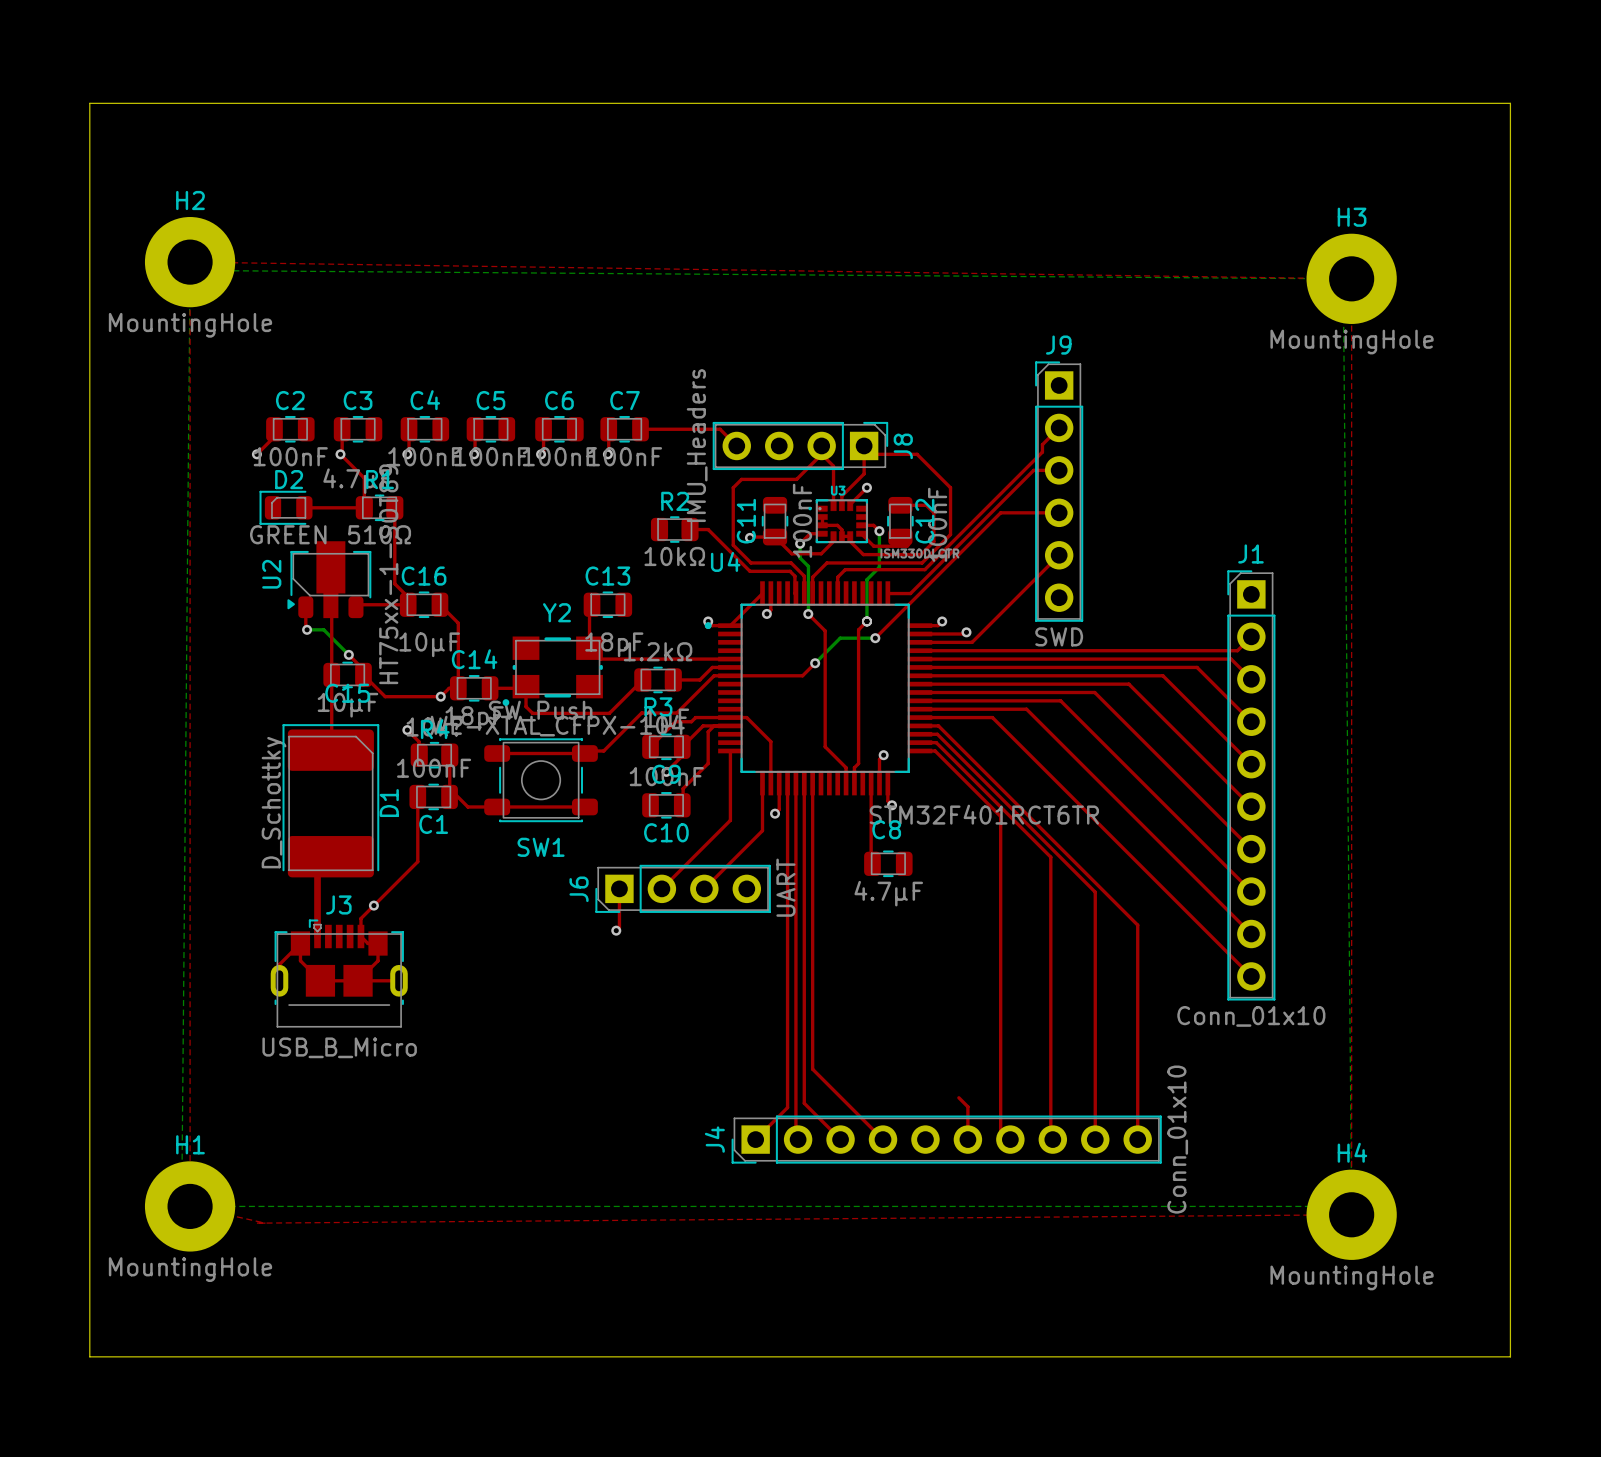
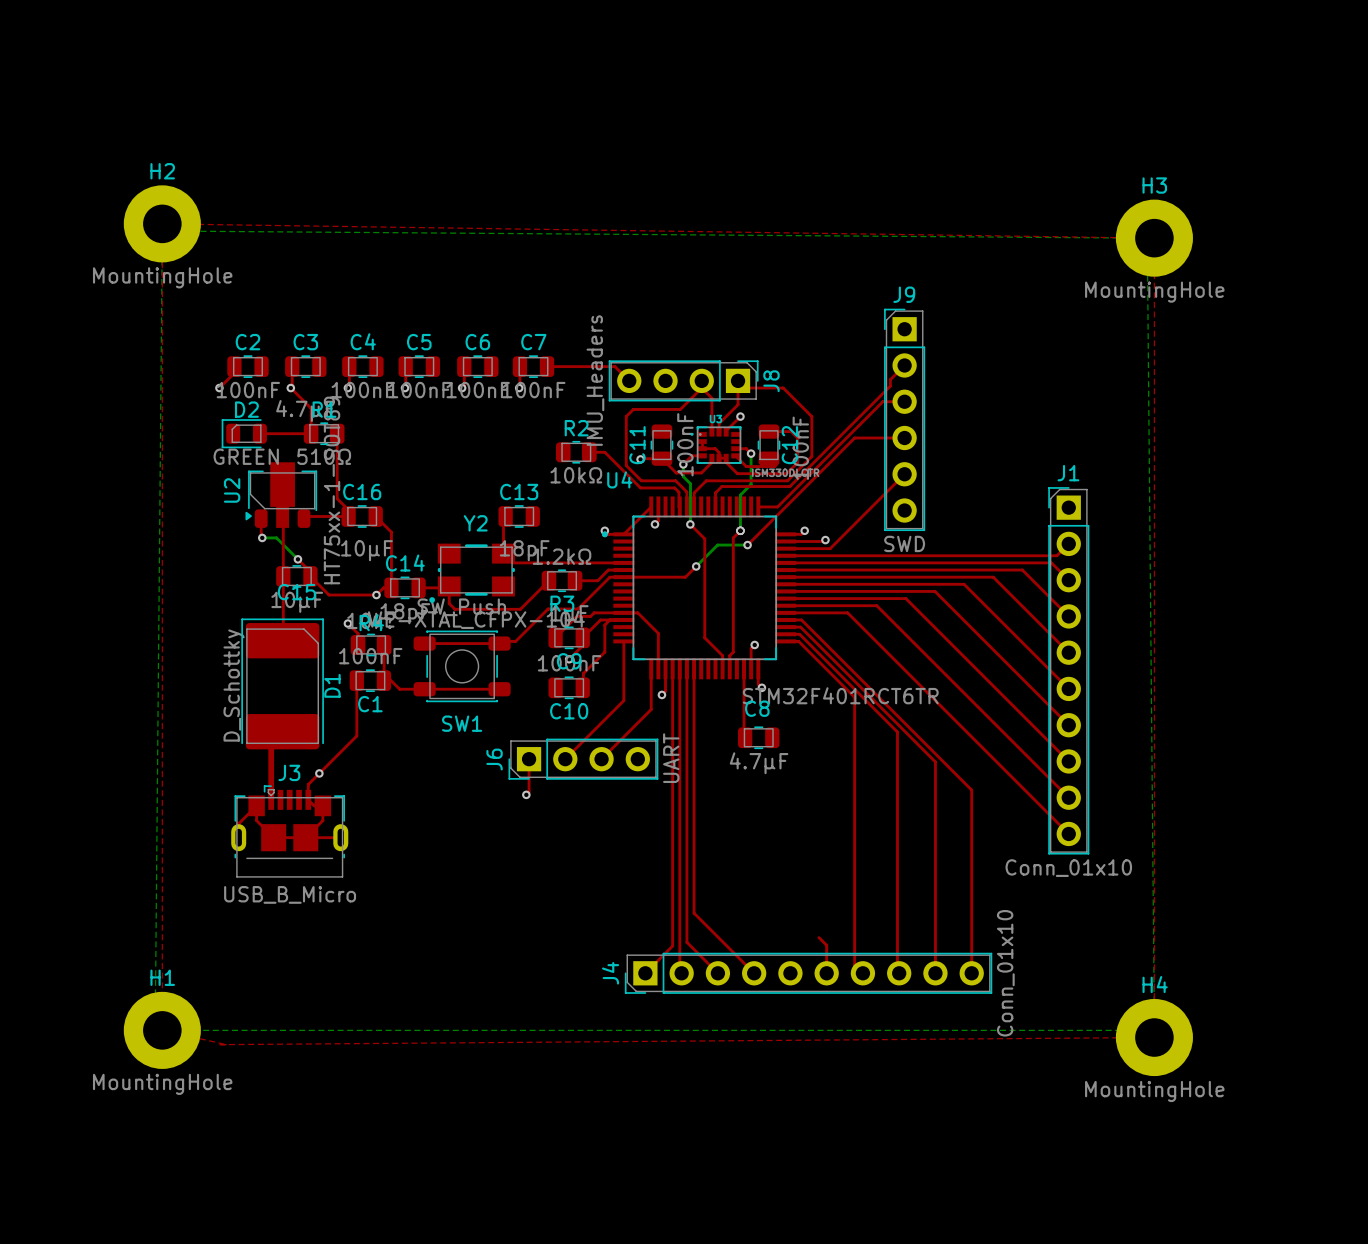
board edge: (89, 103) (1510, 103) (1510, 1356) (89, 1356) (89, 103) -> none

